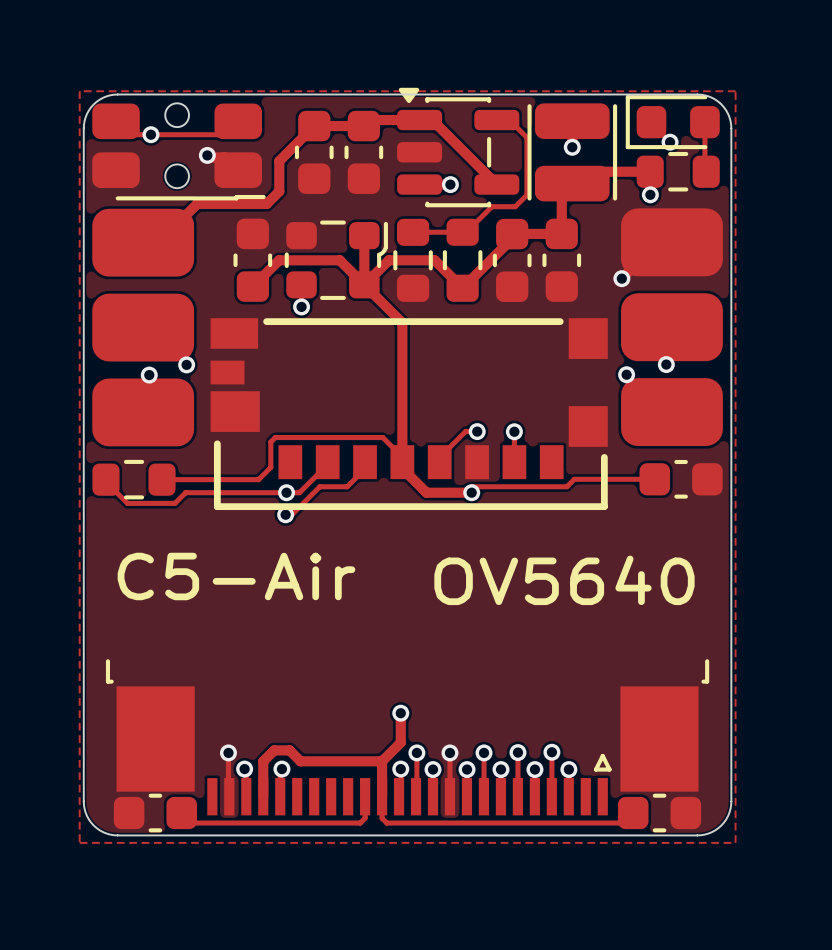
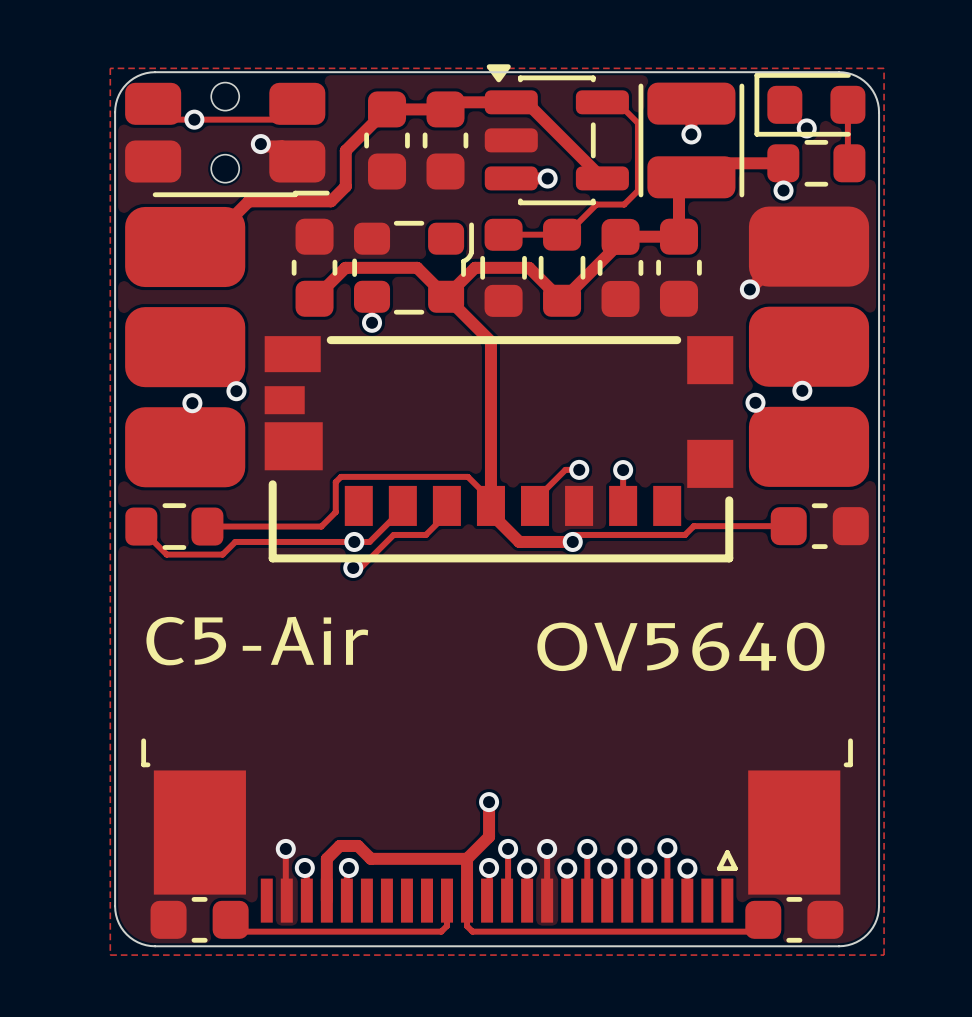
track: (364, 235) (364, 284) -> none

